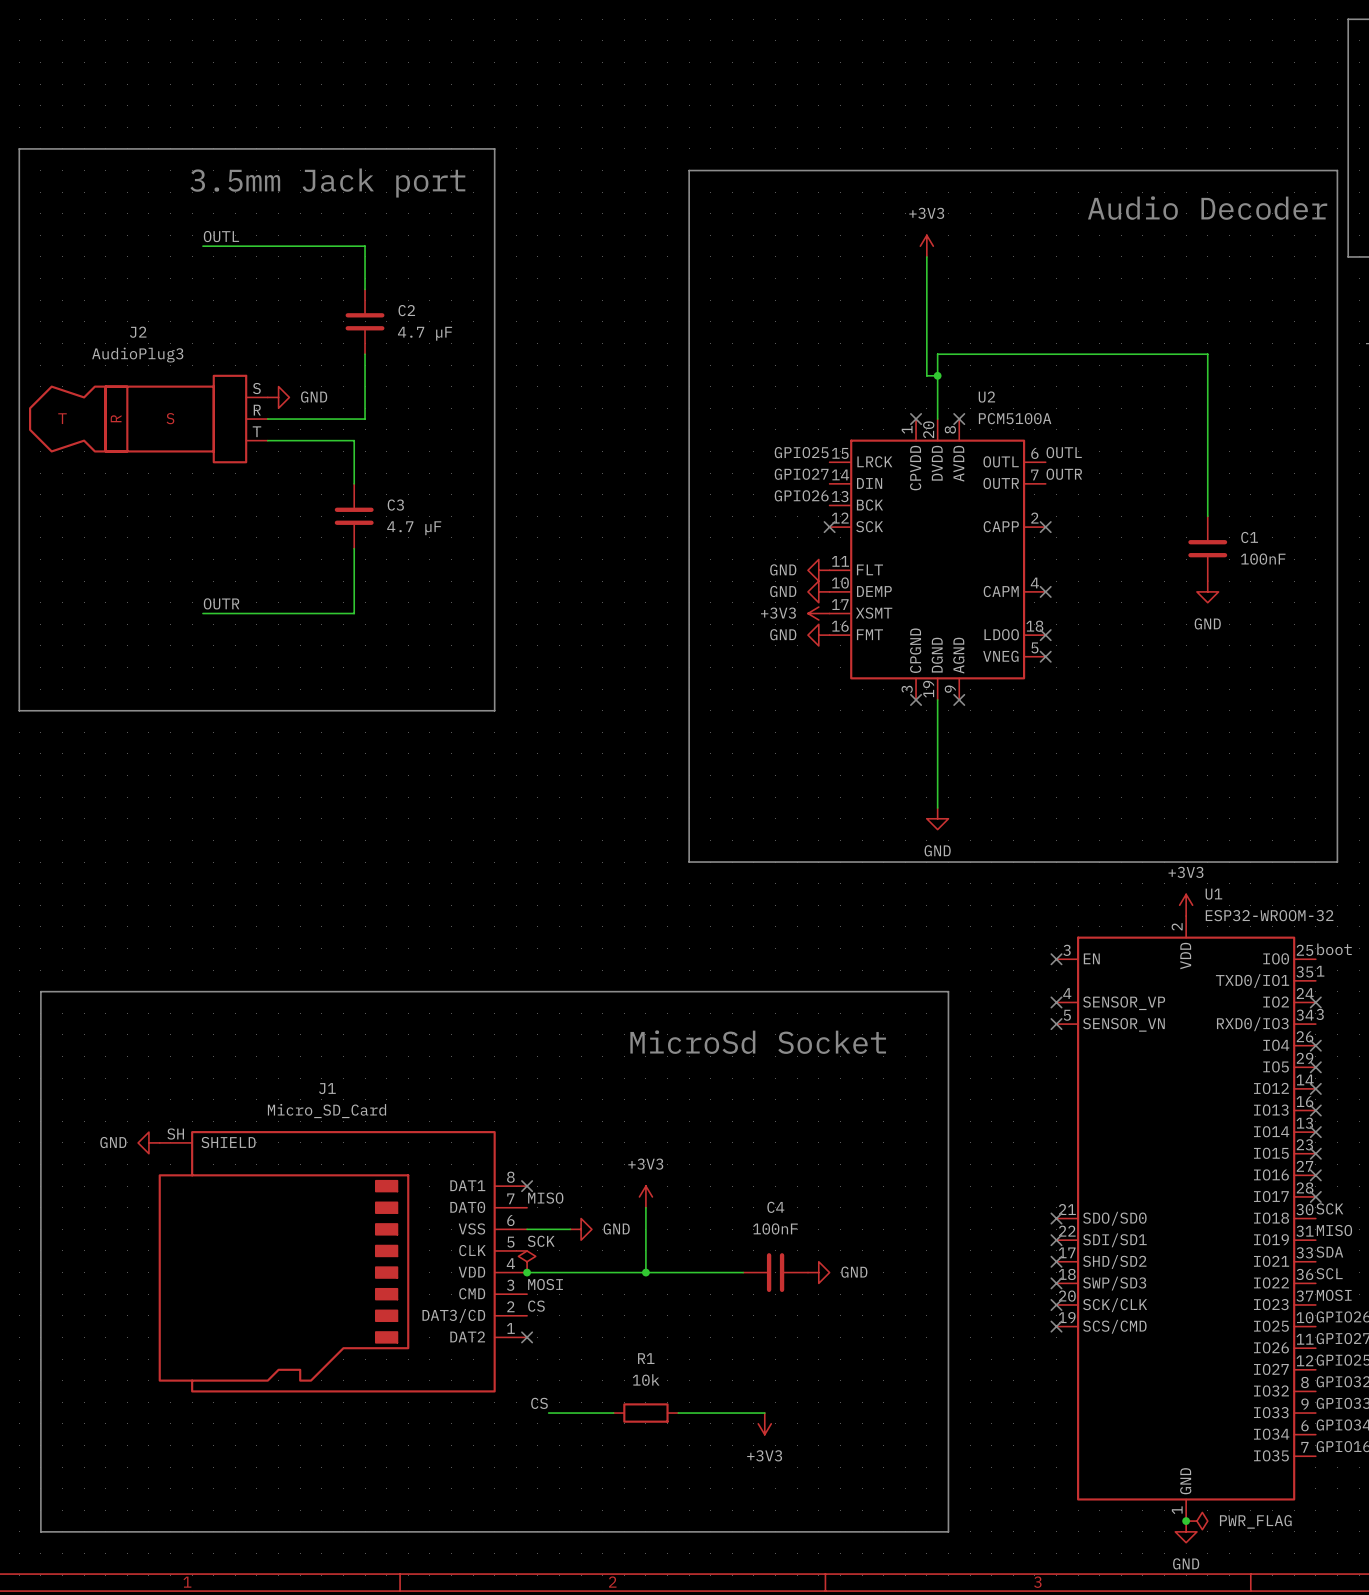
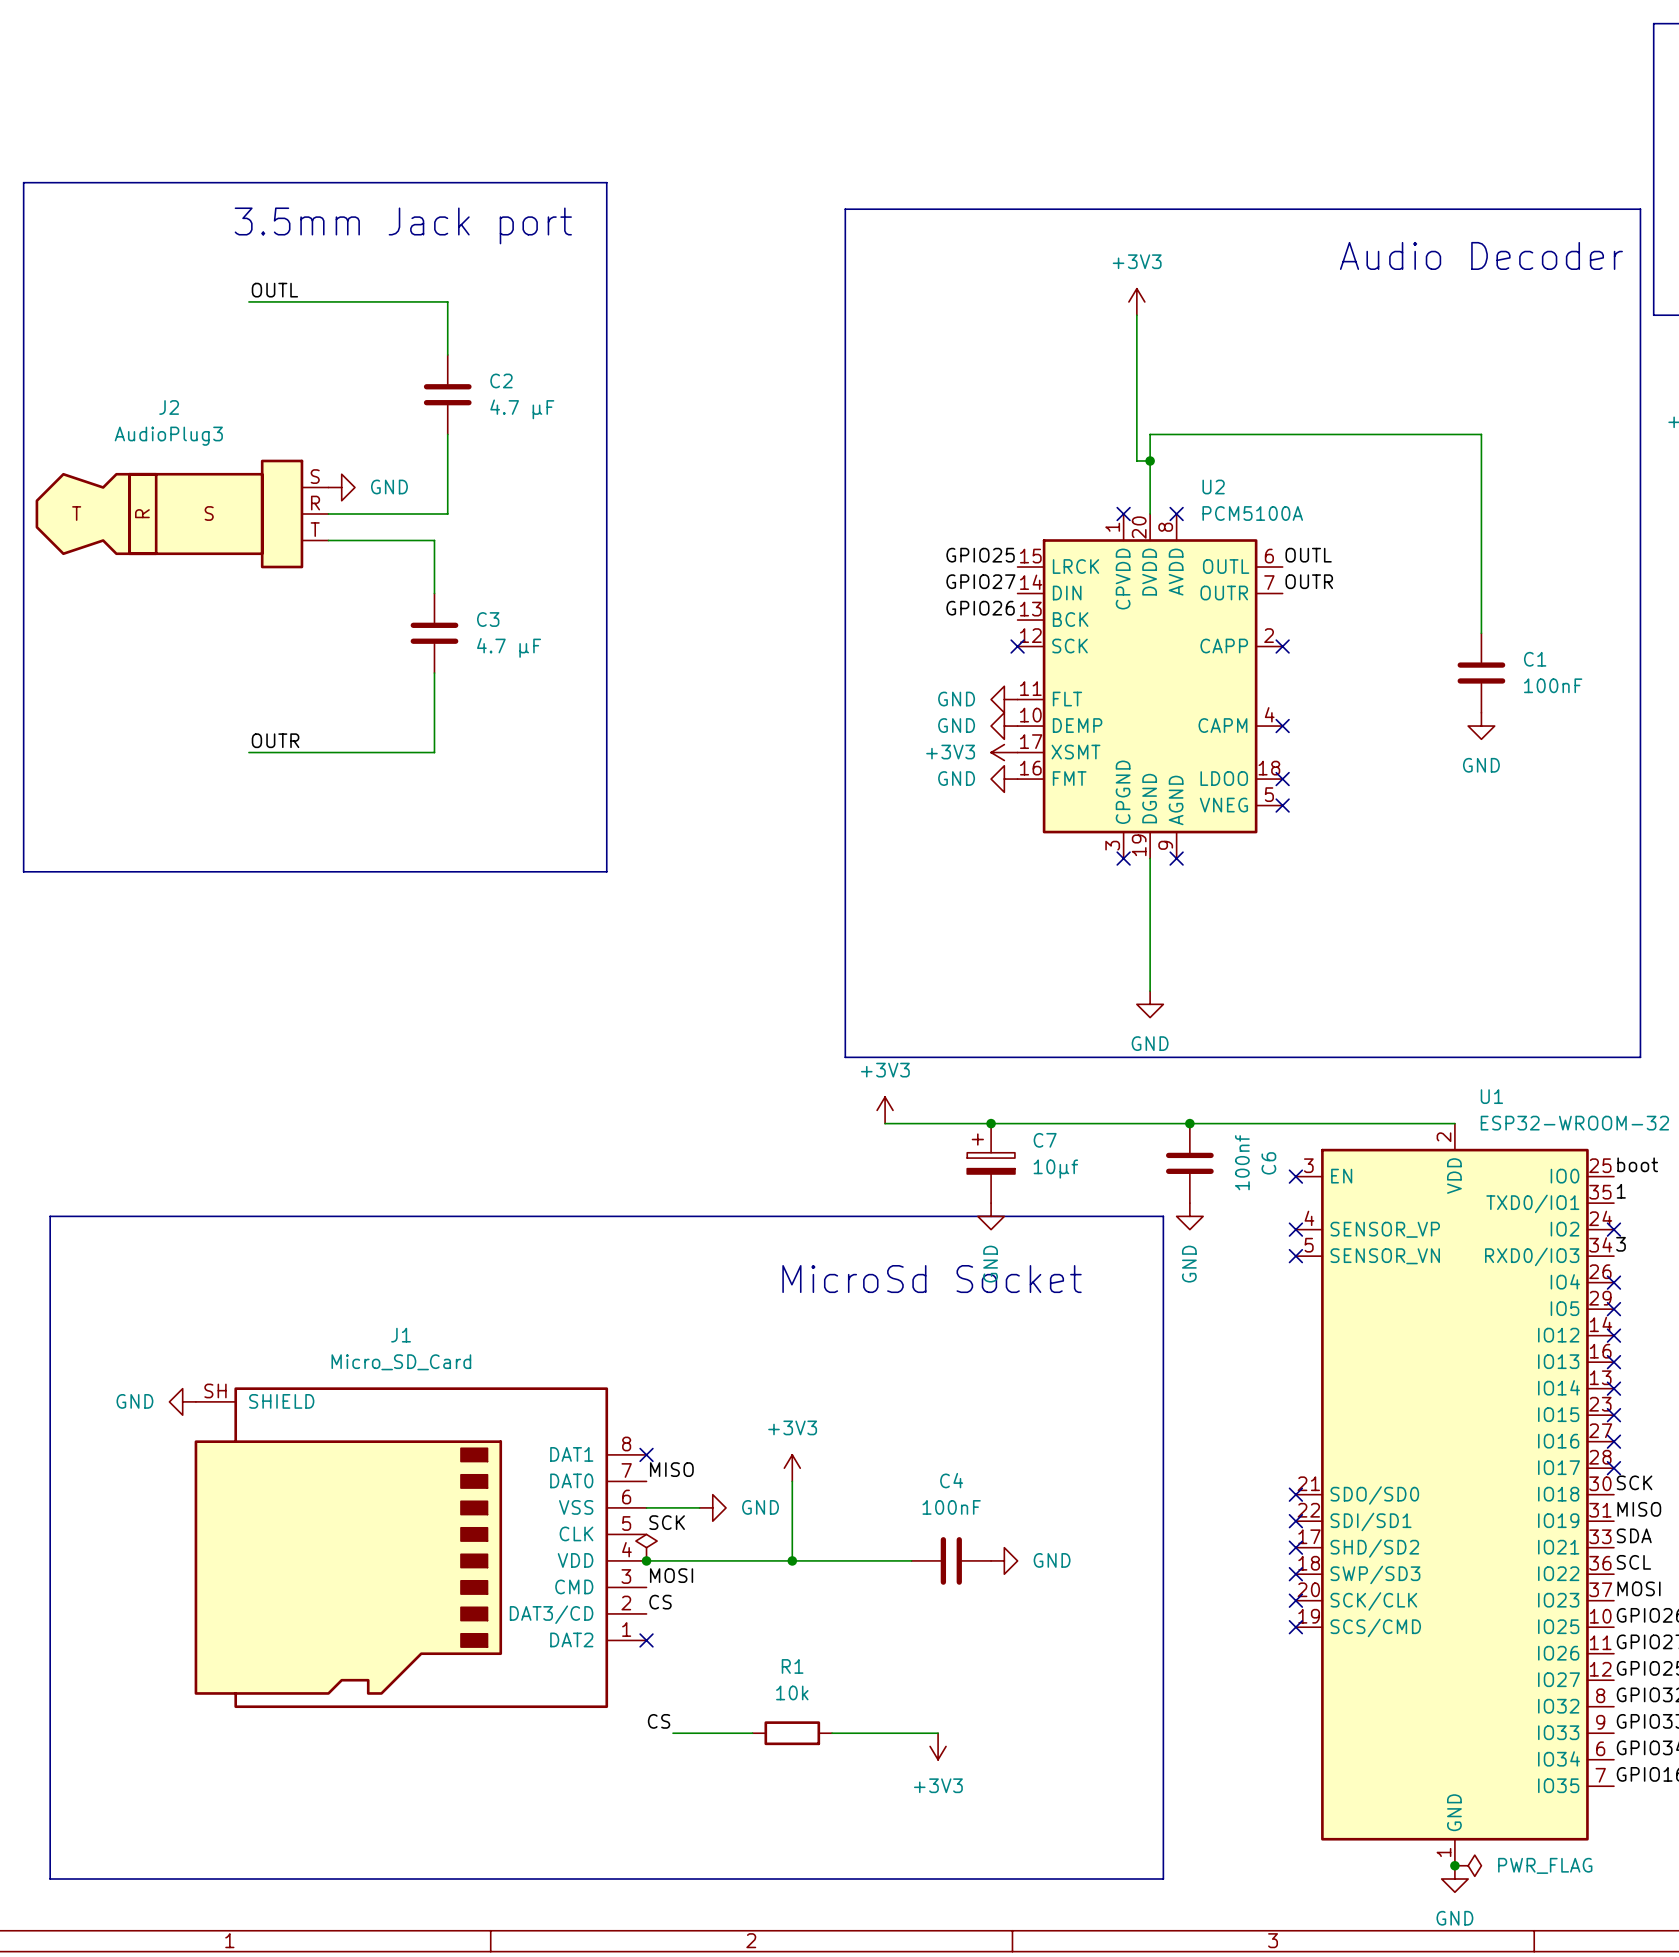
power symbol: none -> +3V3 (885, 1110)
power symbol: +3V3 (1186, 905) -> none
wire: none -> (885, 1123) (1454, 1123)
junction: none -> (991, 1123)
junction: none -> (1189, 1123)
C7: none -> 10μf (991, 1163)
C6: none -> 100nf (1189, 1163)
power symbol: none -> GND (991, 1216)
power symbol: none -> GND (1189, 1216)

